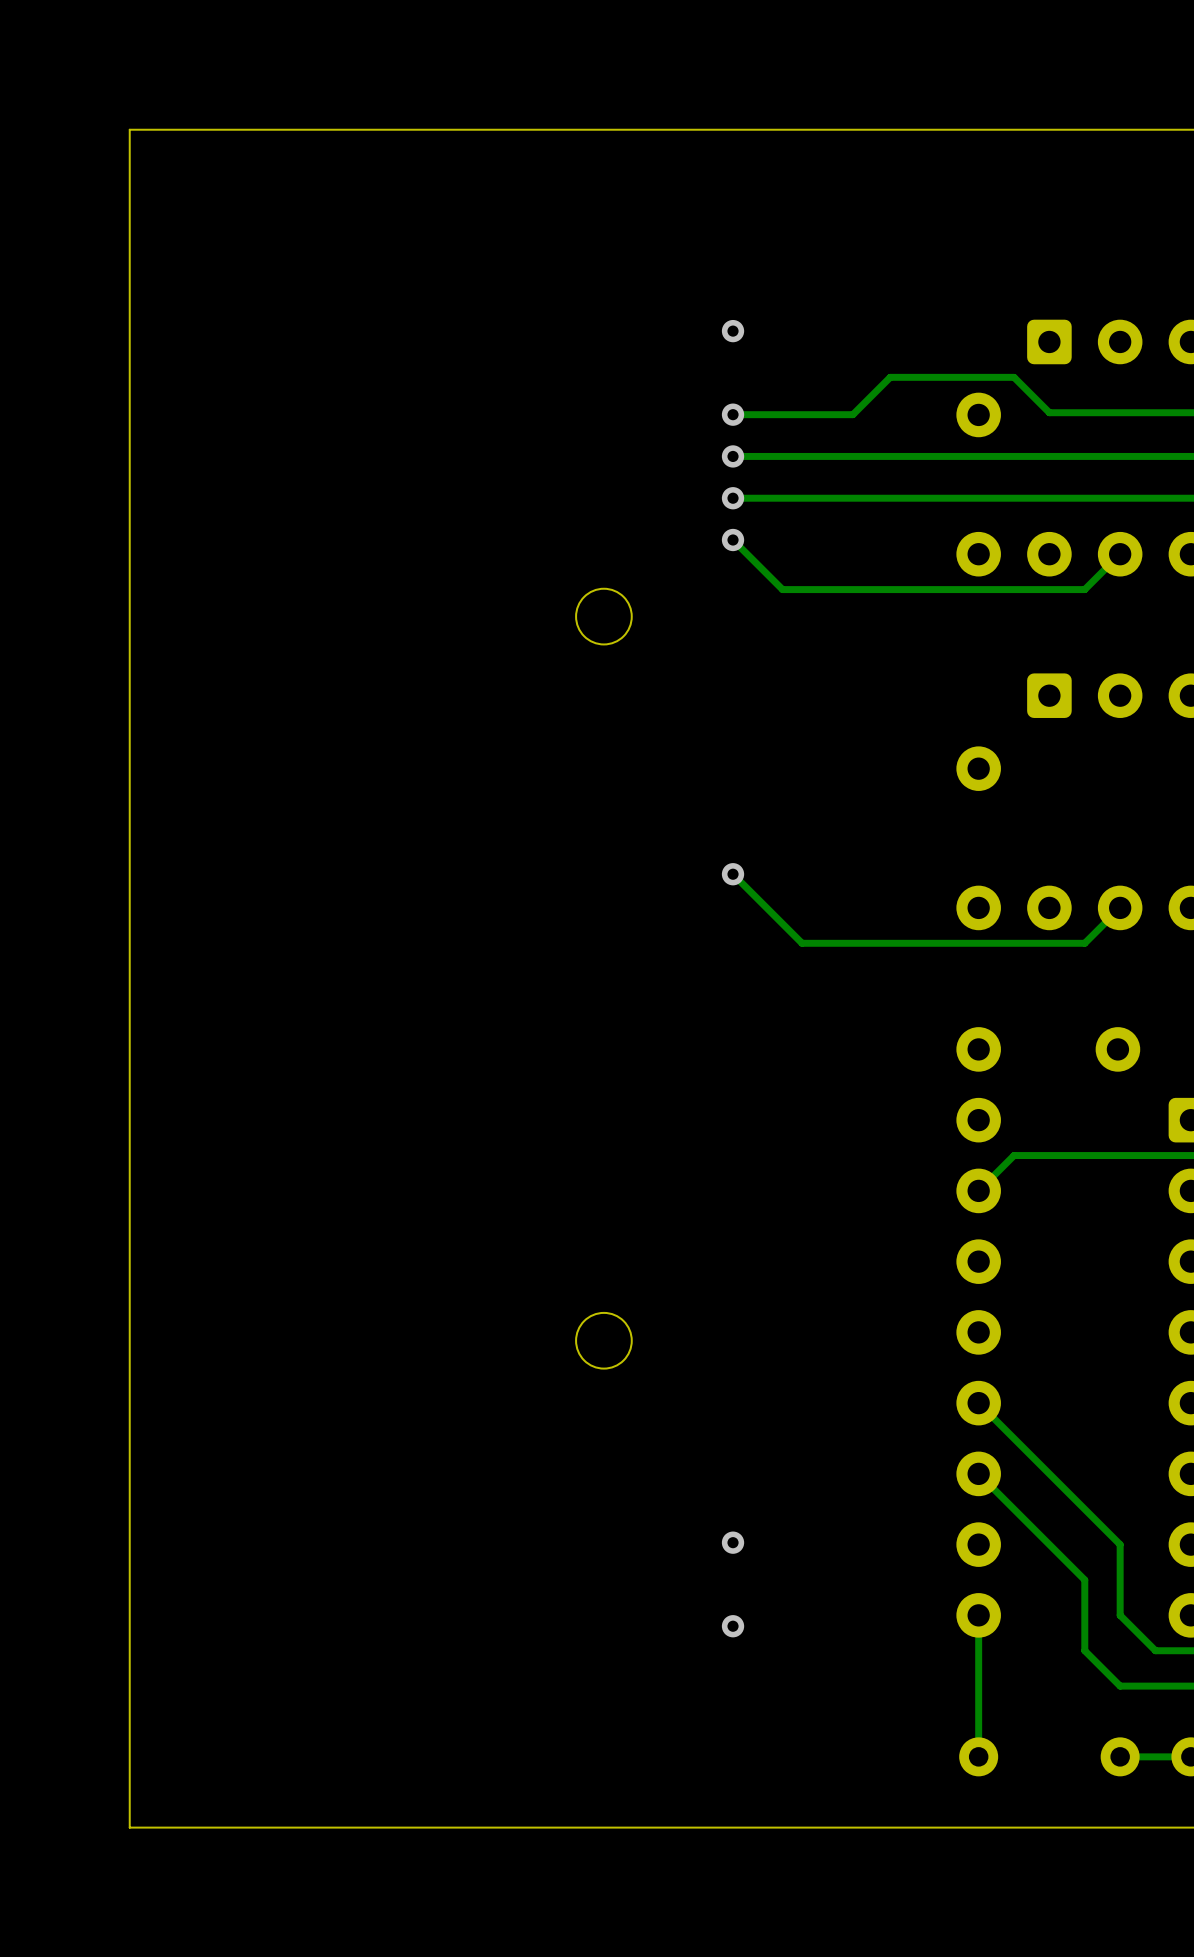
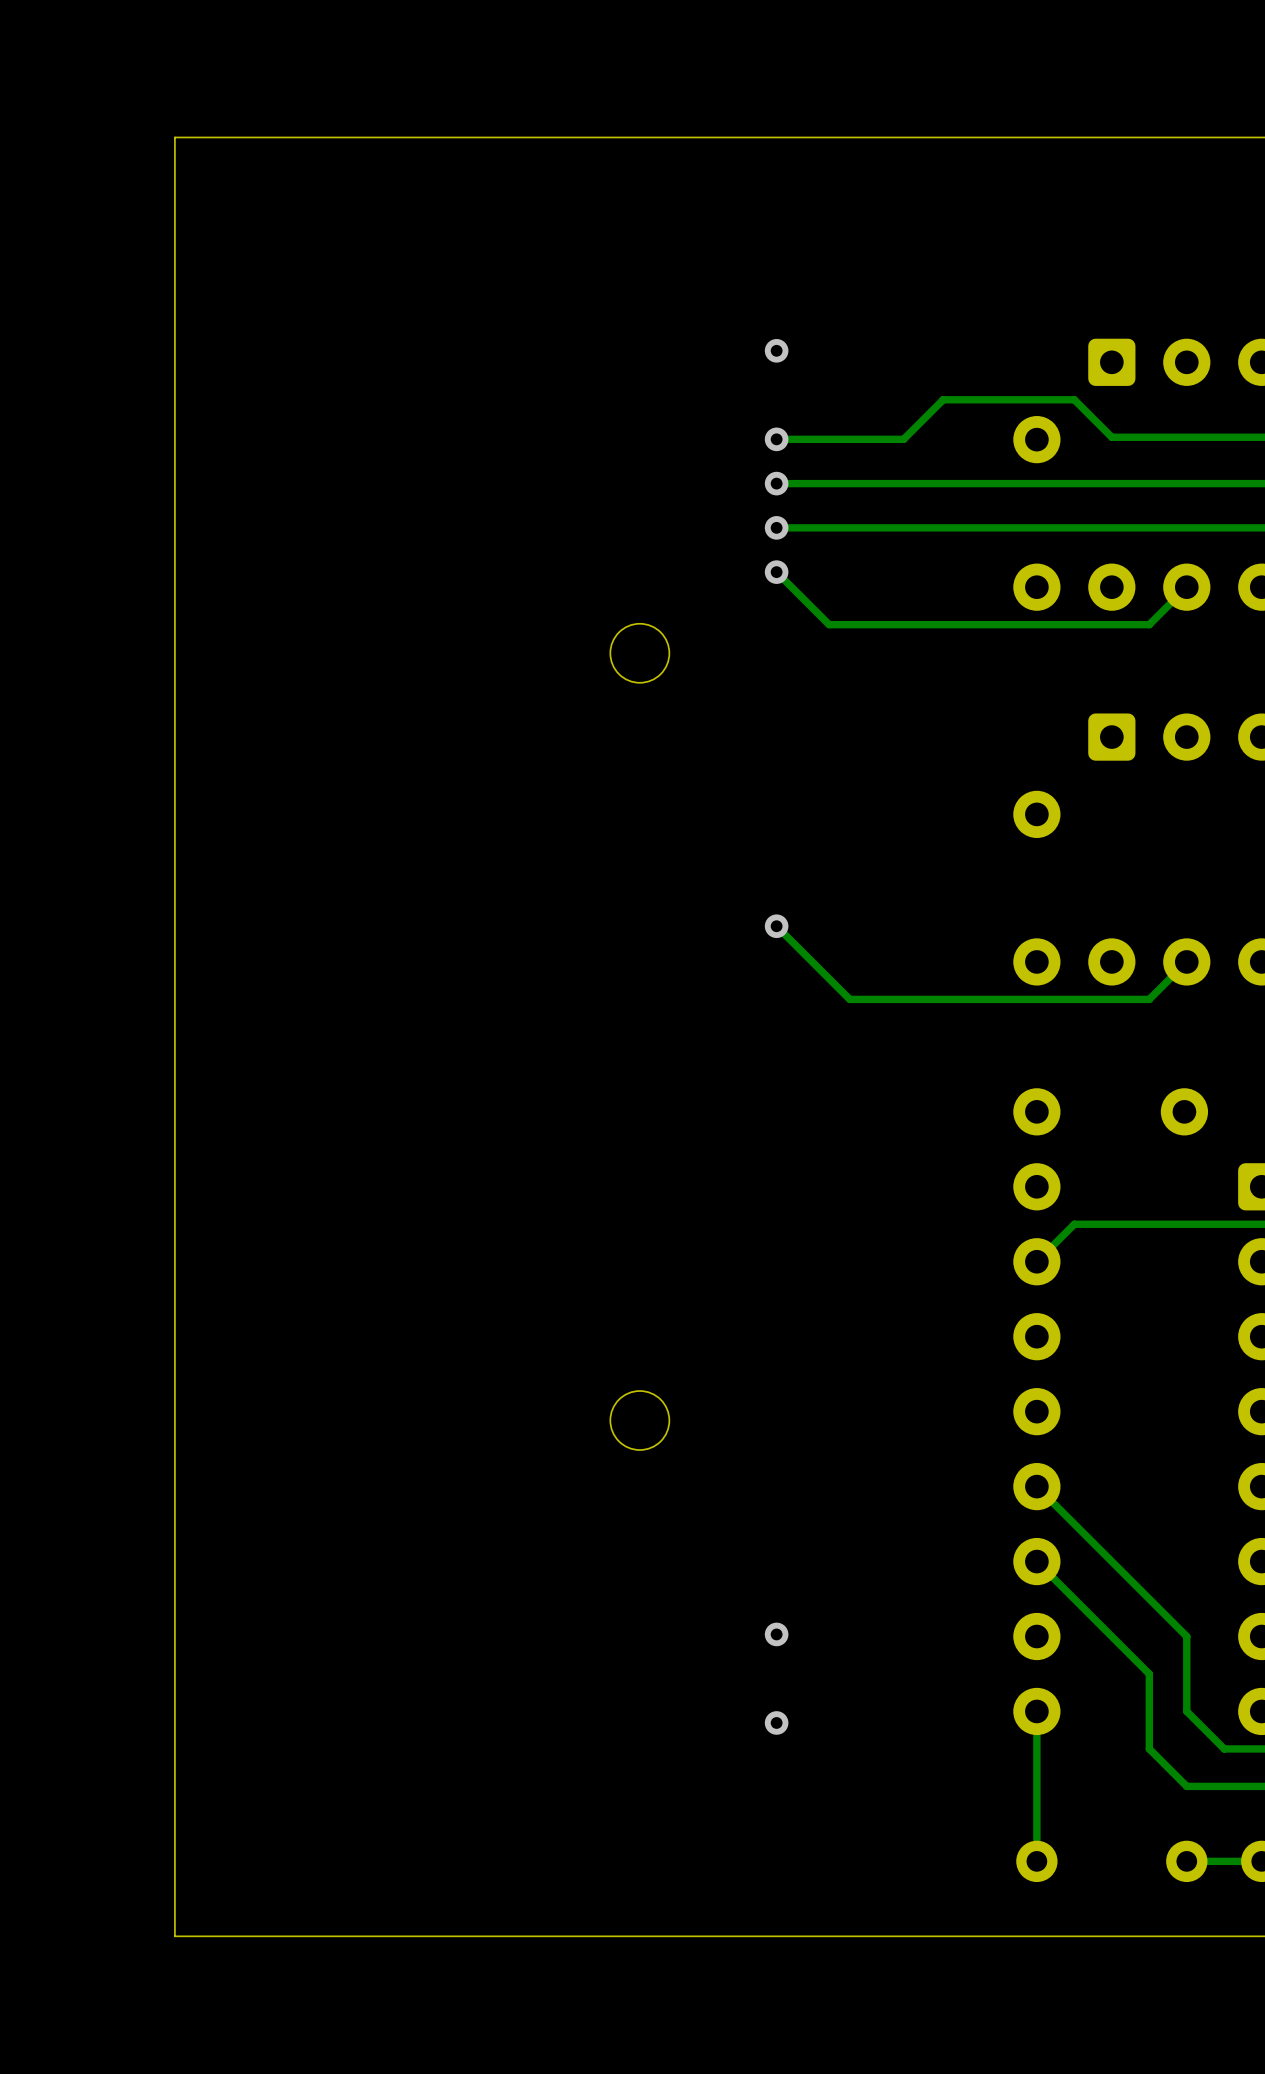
board edge: (165, 129) (129, 129) (129, 1827) (165, 1827) -> (174, 137) (174, 1936)

